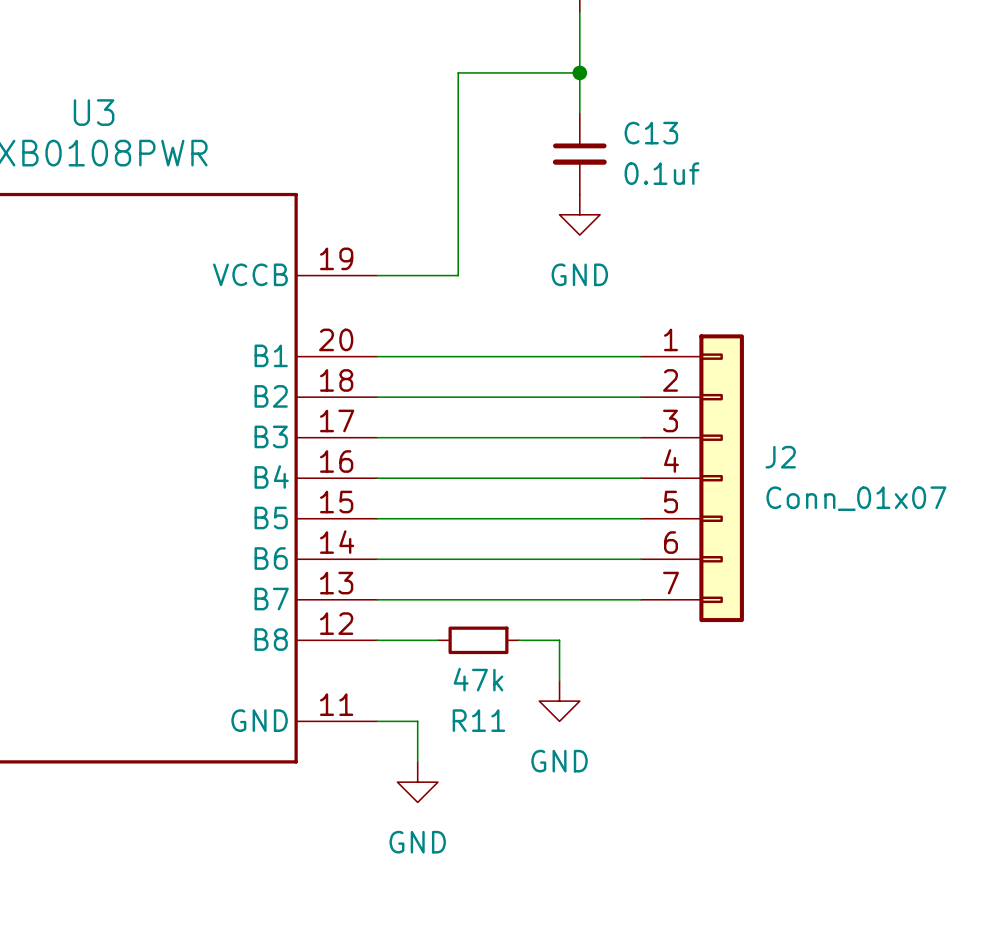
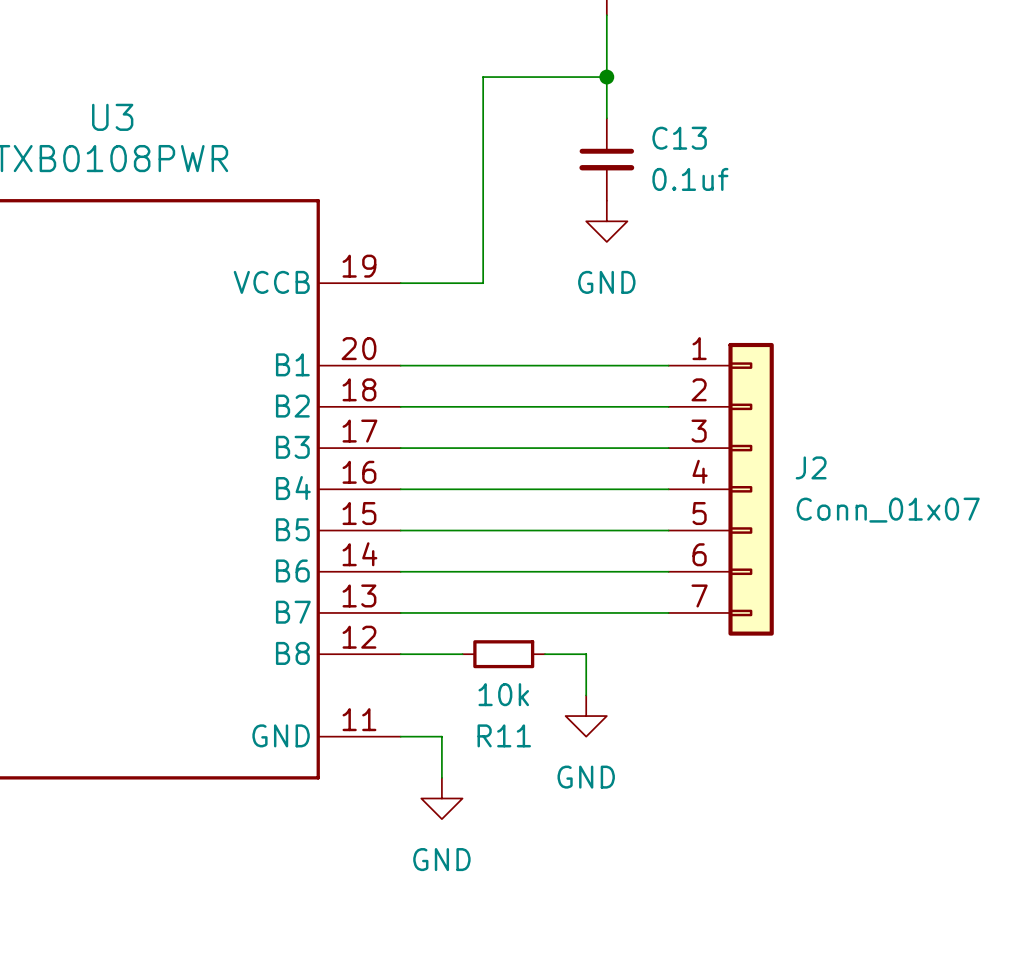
R11 value: 47k (478, 679) -> 10k (503, 694)

